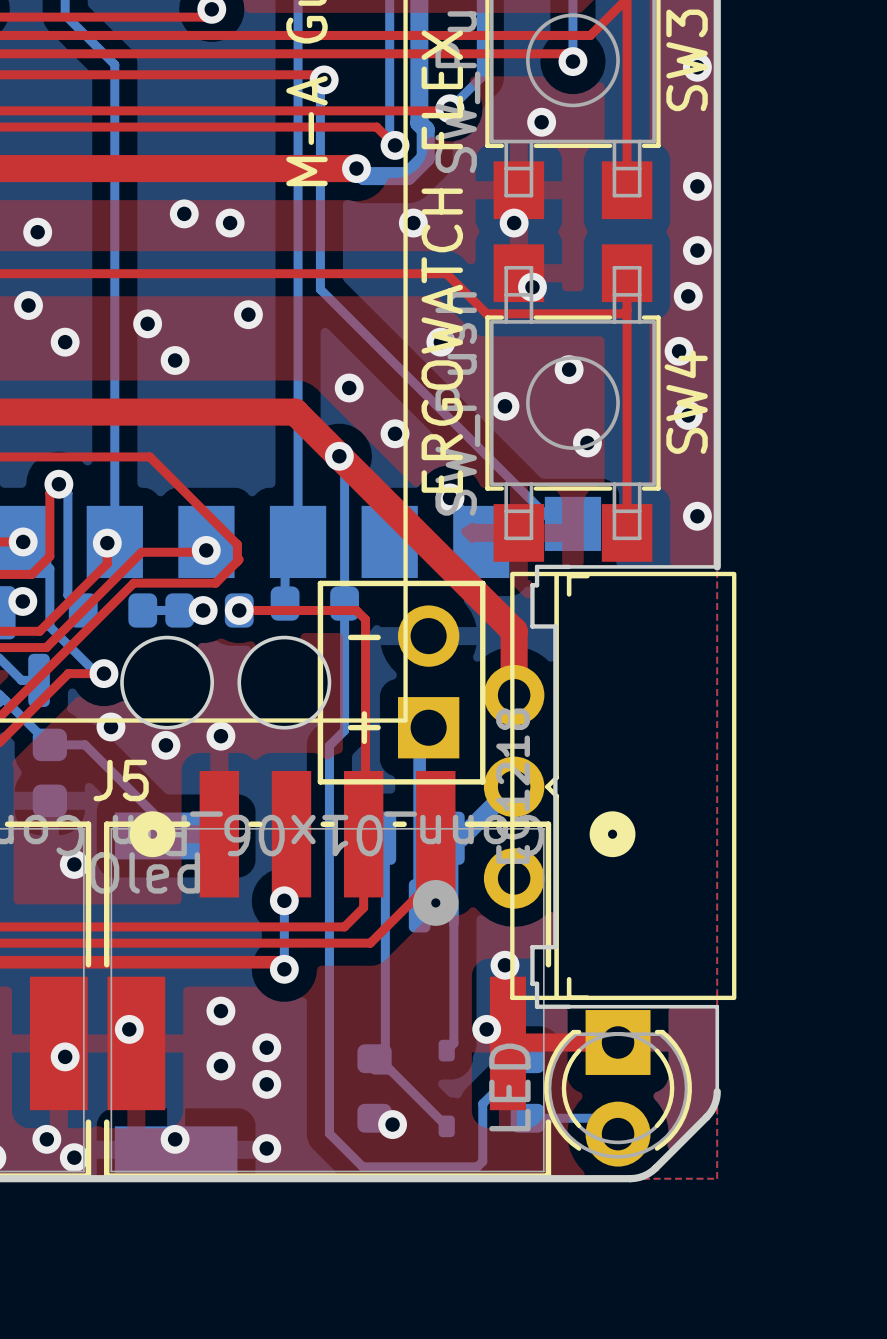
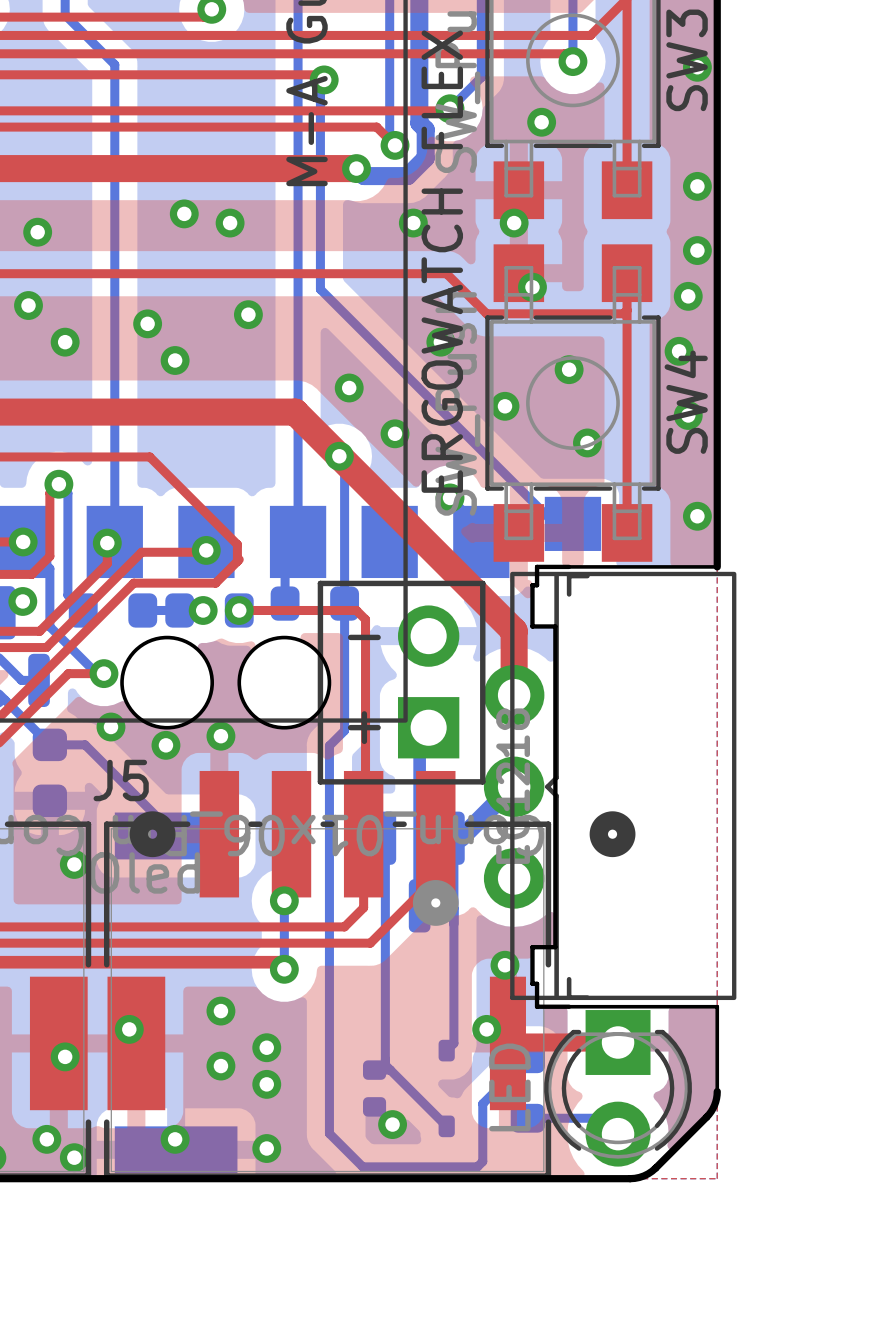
part footprint: [357, 1044, 392, 1133] -> [363, 1060, 387, 1117]

